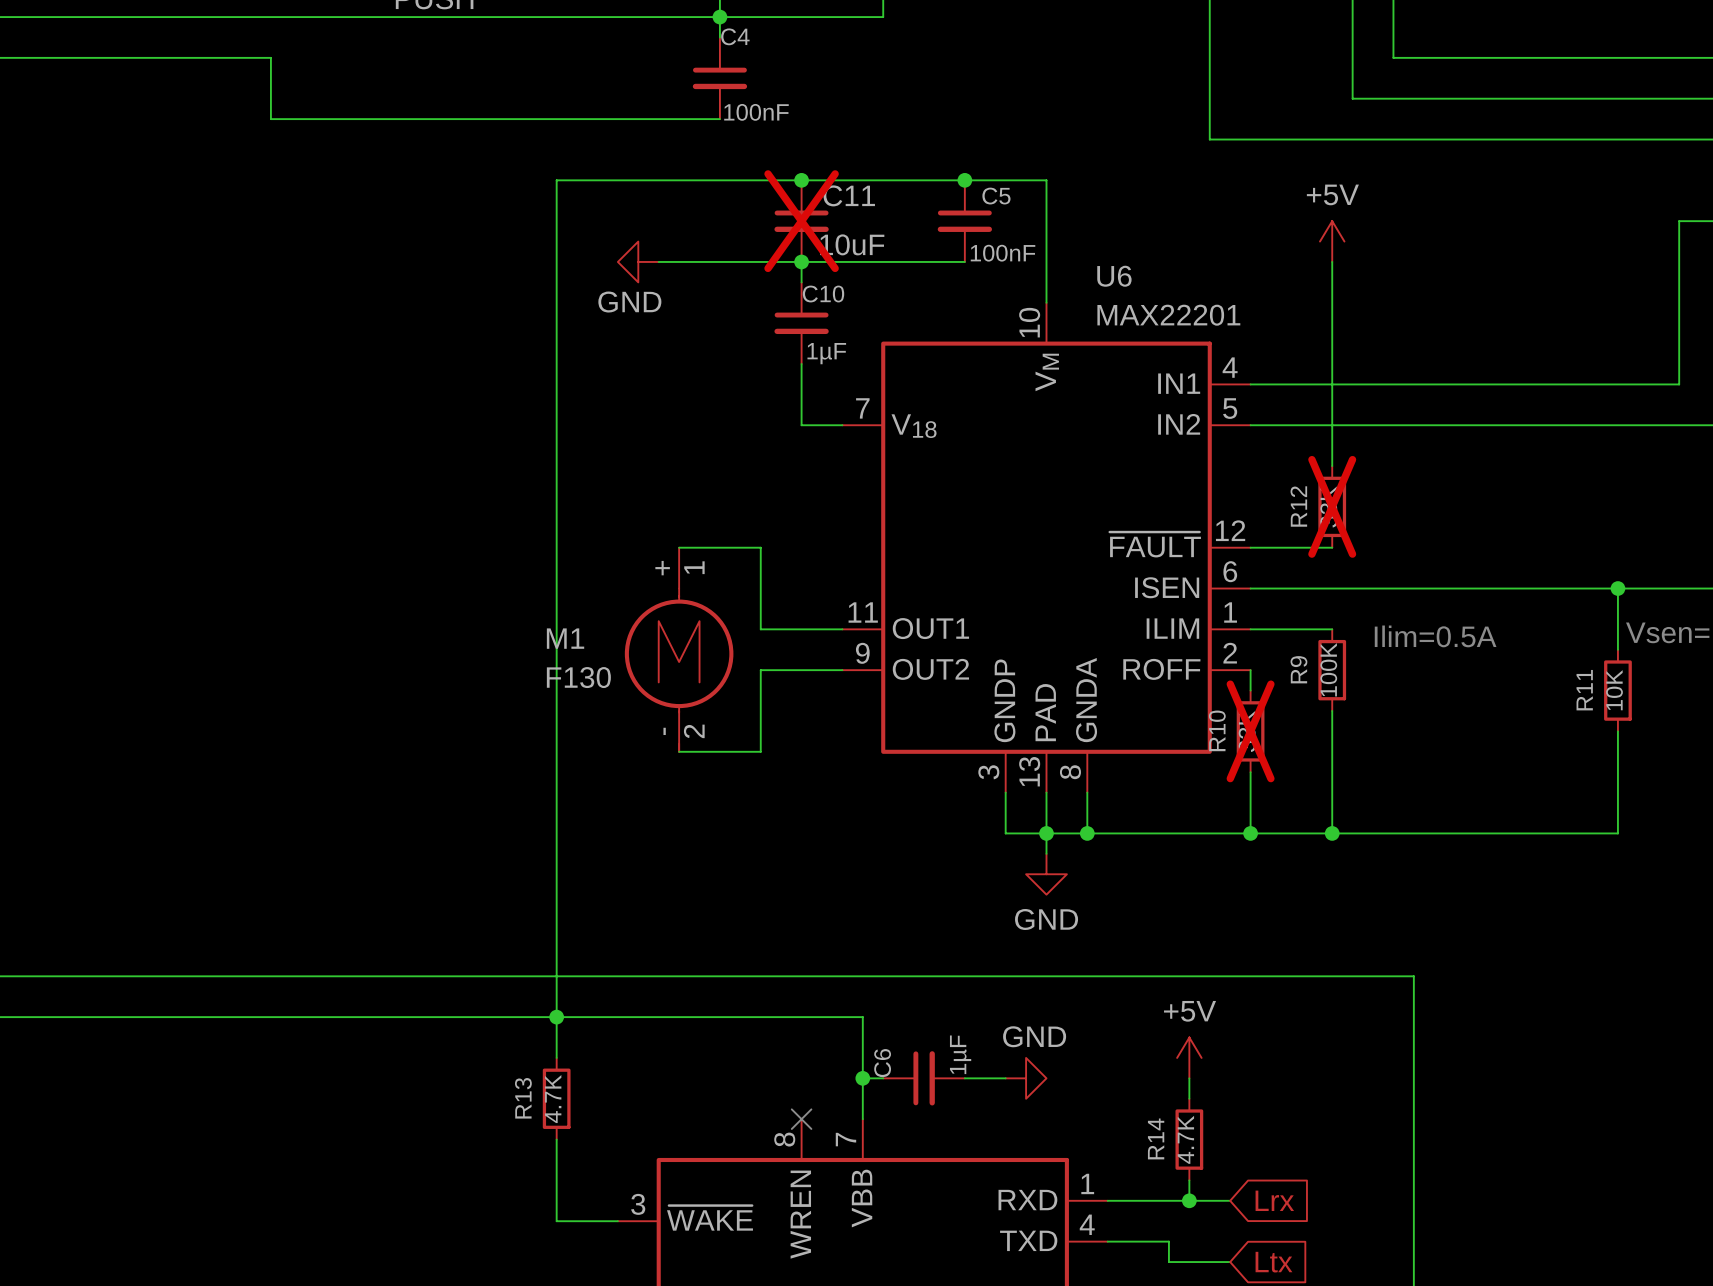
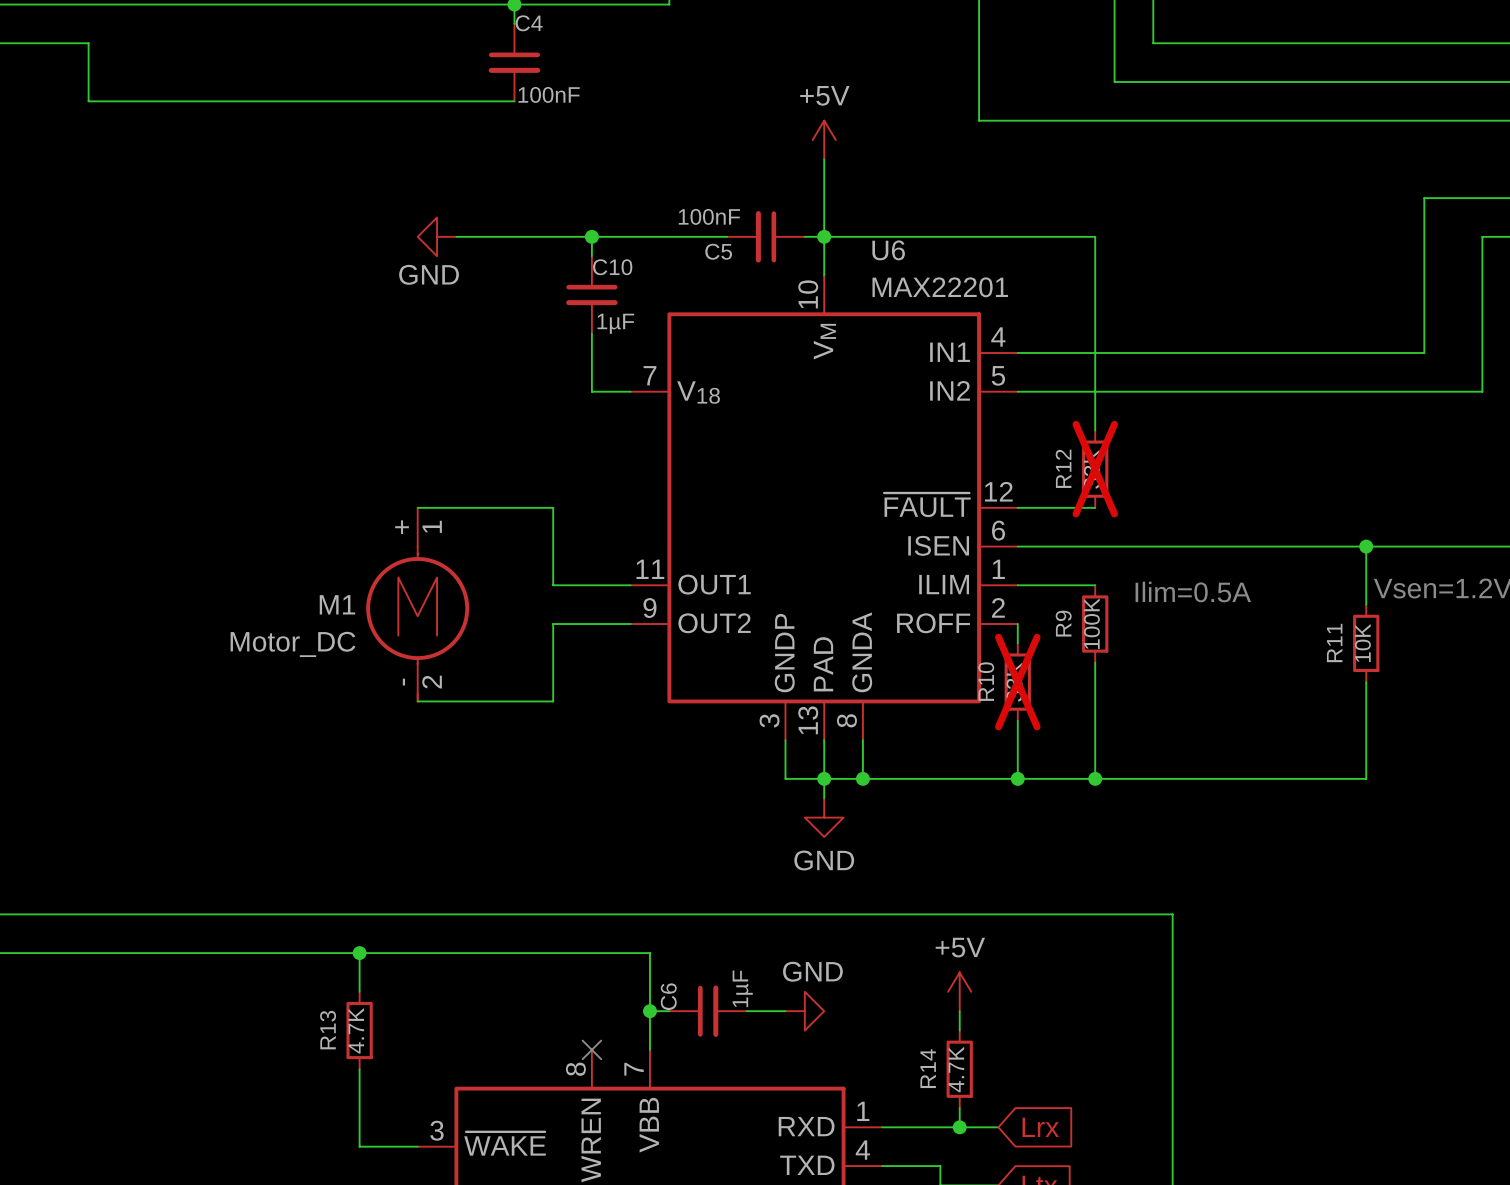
junction: (801, 180) -> none
junction: (964, 180) -> none
wire: (1046, 180) (556, 180) (556, 1017) -> none
C5 name position: C5 (996, 196) -> C5 (718, 251)
C11: 10uF (801, 221) -> none
C5 rotation: 0° (964, 221) -> 90° clockwise (766, 236)
power symbol position: +5V (1332, 241) -> +5V (824, 140)
C5 value position: 100nF (1003, 253) -> 100nF (709, 216)
wire: none -> (804, 236) (1095, 236)
junction: none -> (824, 236)
wire: none -> (417, 507) (475, 507)
M1 name position: M1 (565, 638) -> M1 (337, 604)
M1 position: (679, 649) -> (417, 604)
M1 value: F130 (578, 677) -> Motor_DC (293, 644)
wire: none -> (417, 701) (475, 701)

